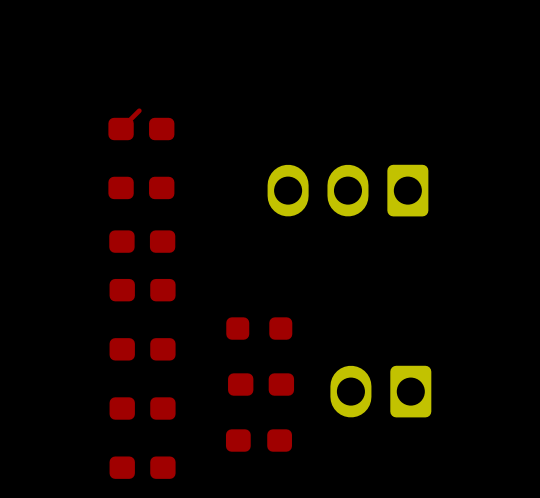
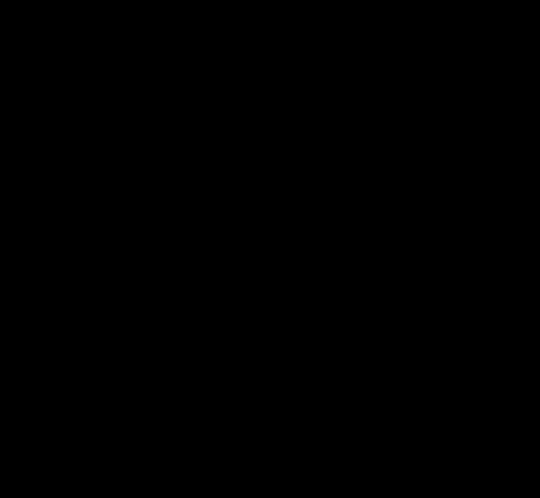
top track: (139, 110) (121, 129) (122, 130) -> none
part: (141, 129) -> none
part: (141, 187) -> none
part: (347, 190) -> none
part: (142, 241) -> none
part: (142, 290) -> none
part: (259, 328) -> none
part: (142, 349) -> none
part: (261, 384) -> none
part: (380, 391) -> none
part: (142, 408) -> none
part: (258, 440) -> none
part: (142, 467) -> none

